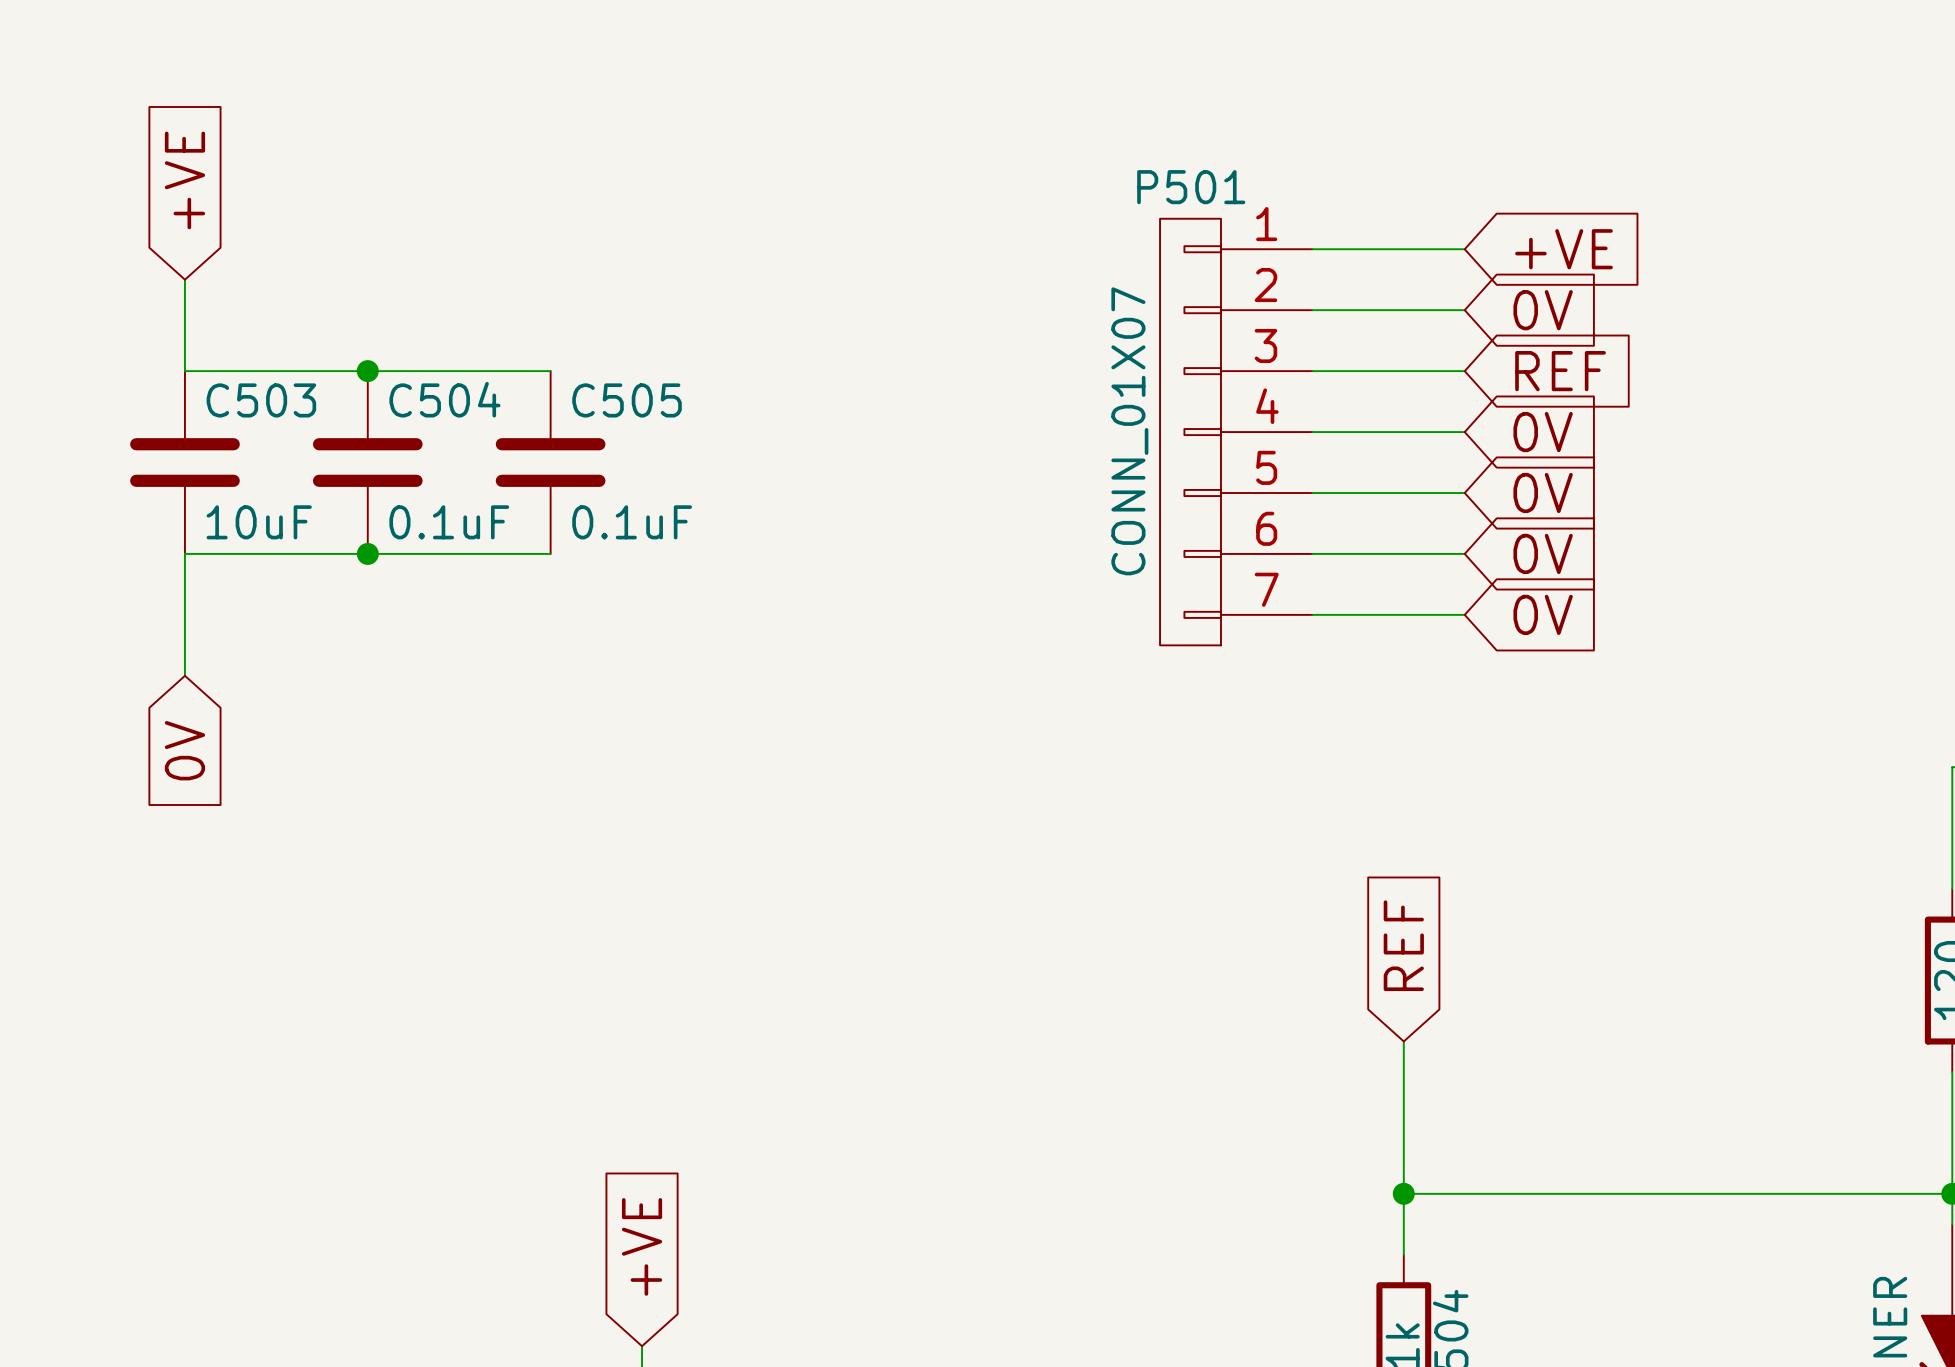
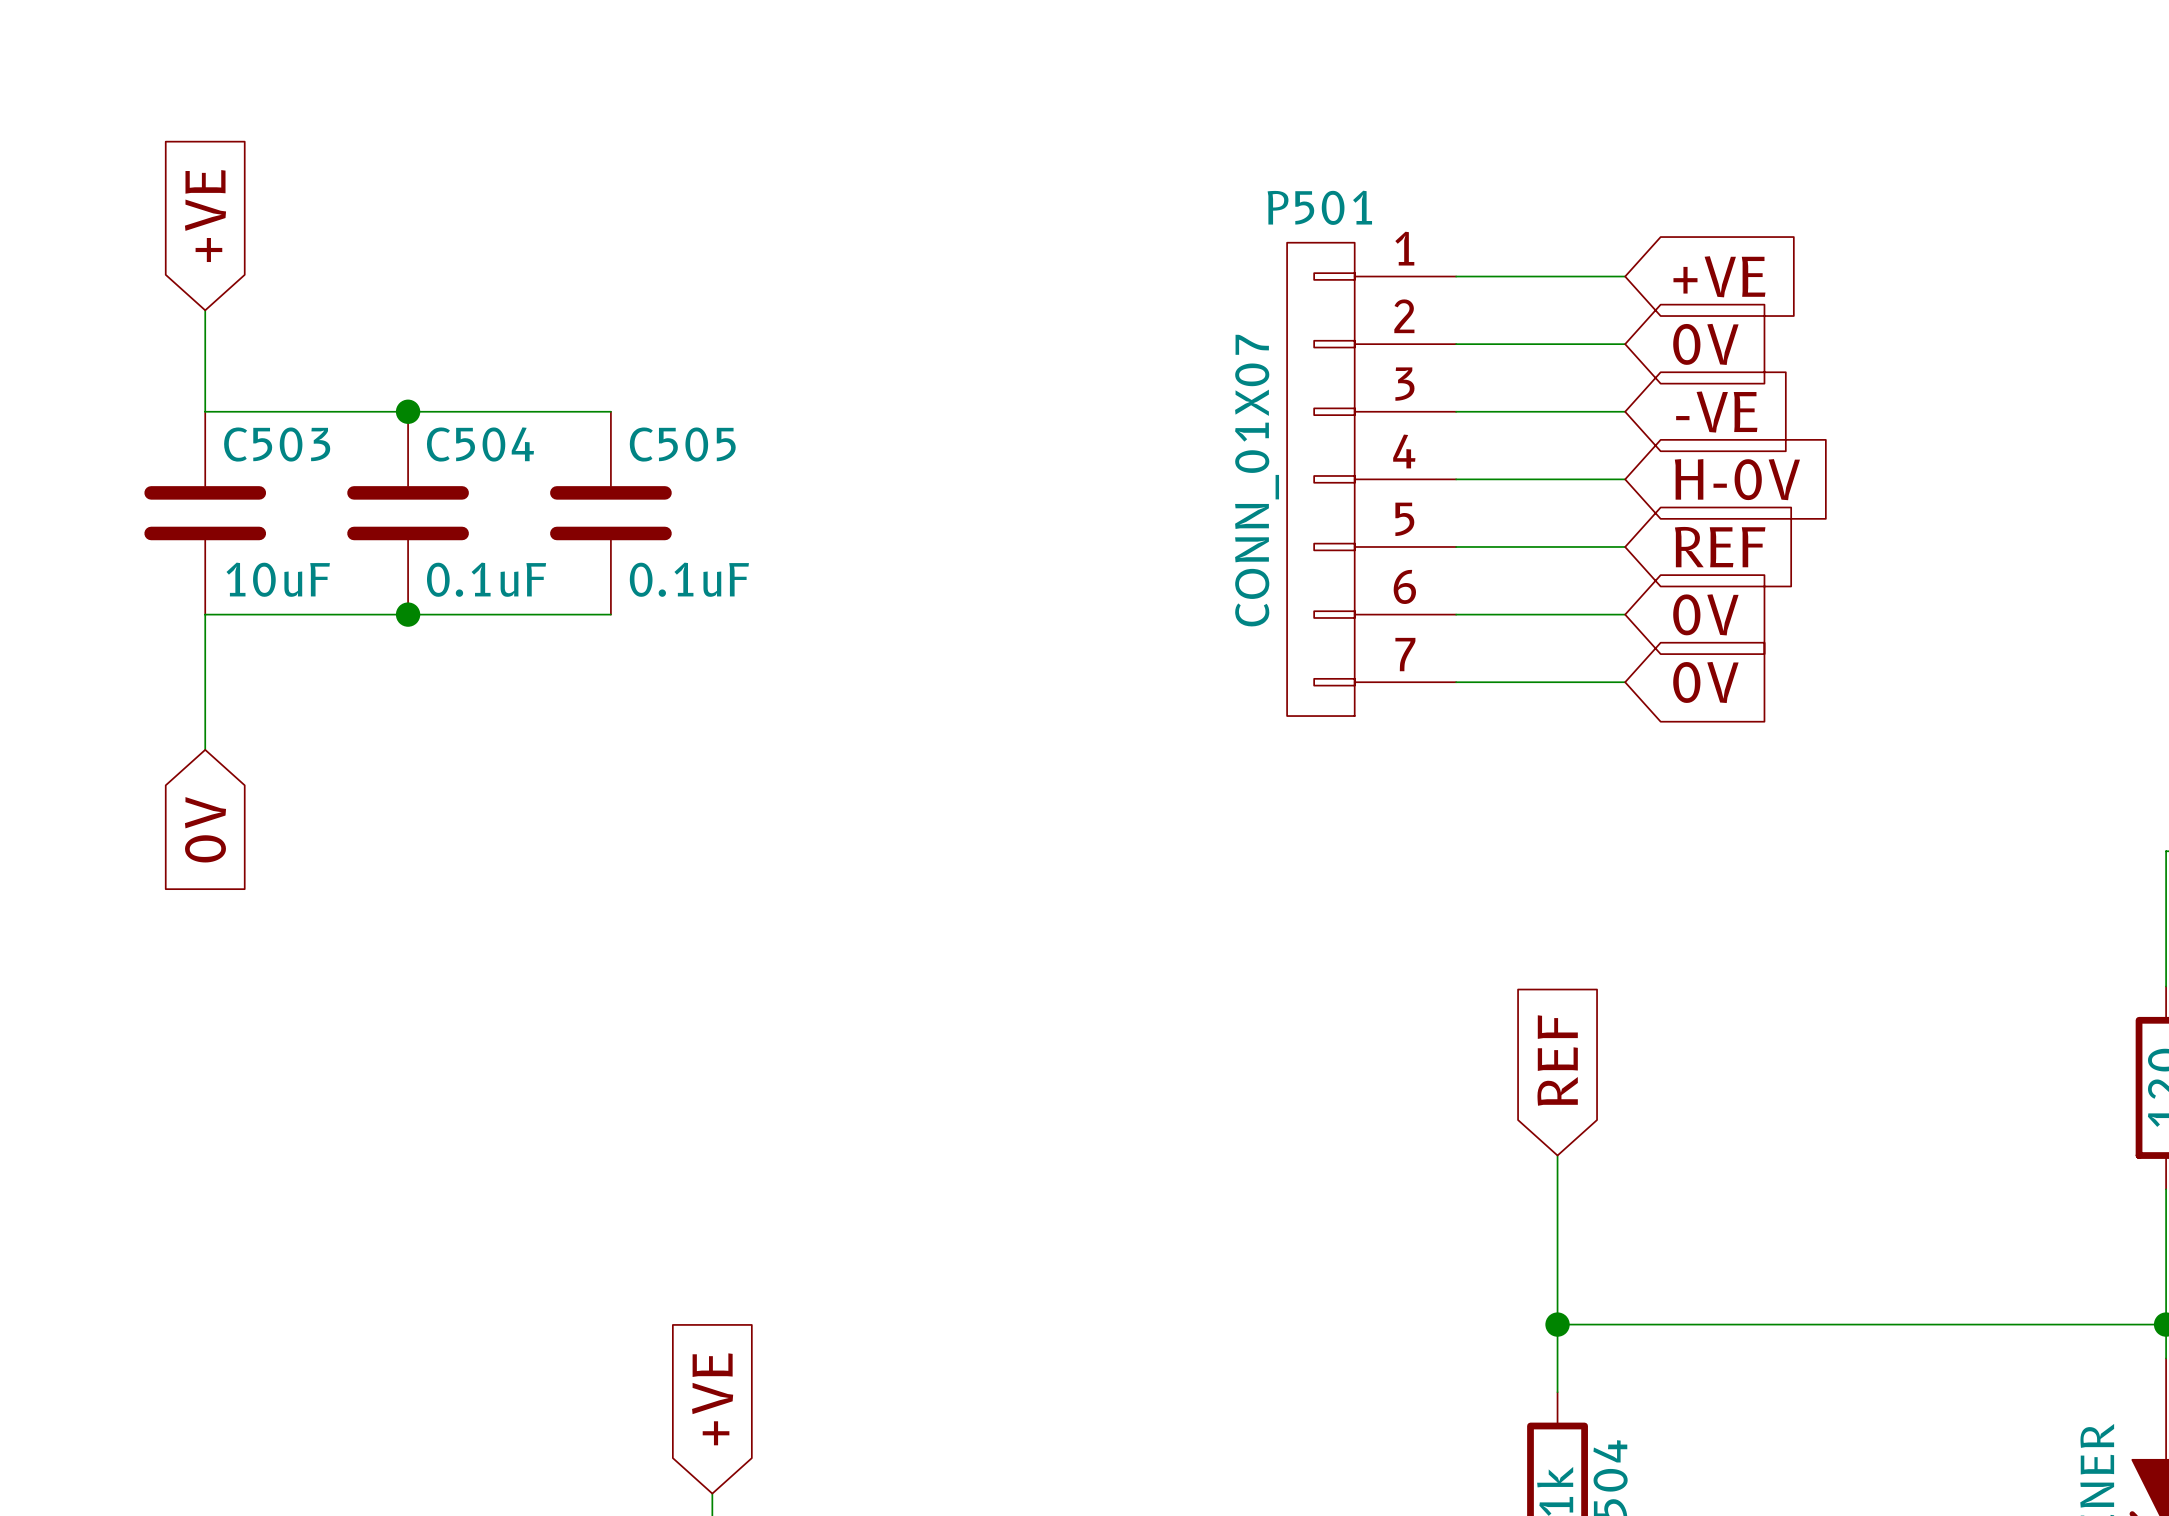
global label: REF (1560, 371) -> -VE (1716, 412)
global label: 0V (1543, 432) -> H-0V (1737, 479)
global label: 0V (1543, 492) -> REF (1720, 547)

